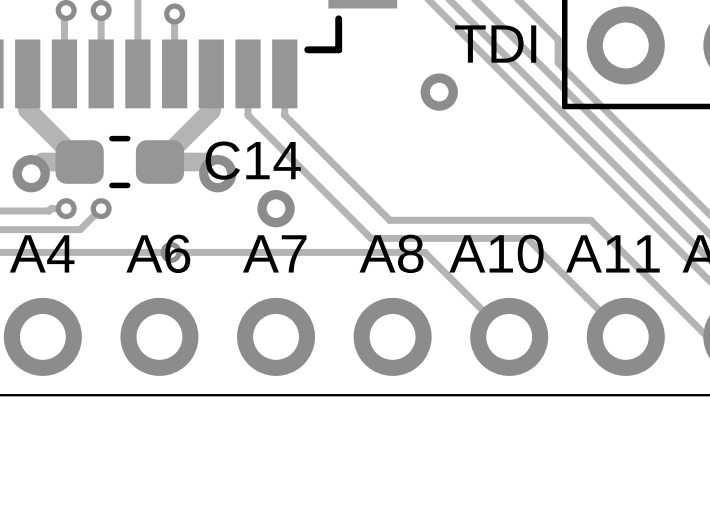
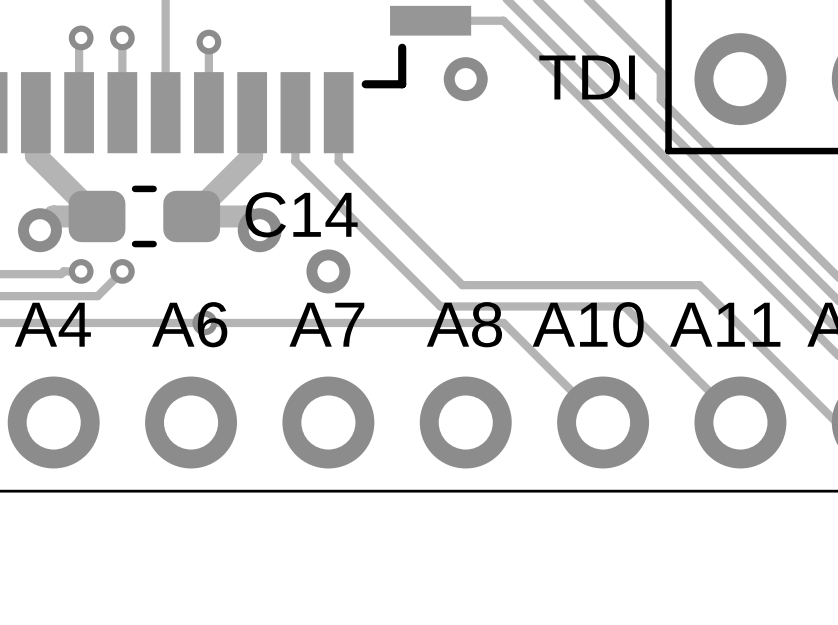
via position: (439, 92) -> (465, 79)

